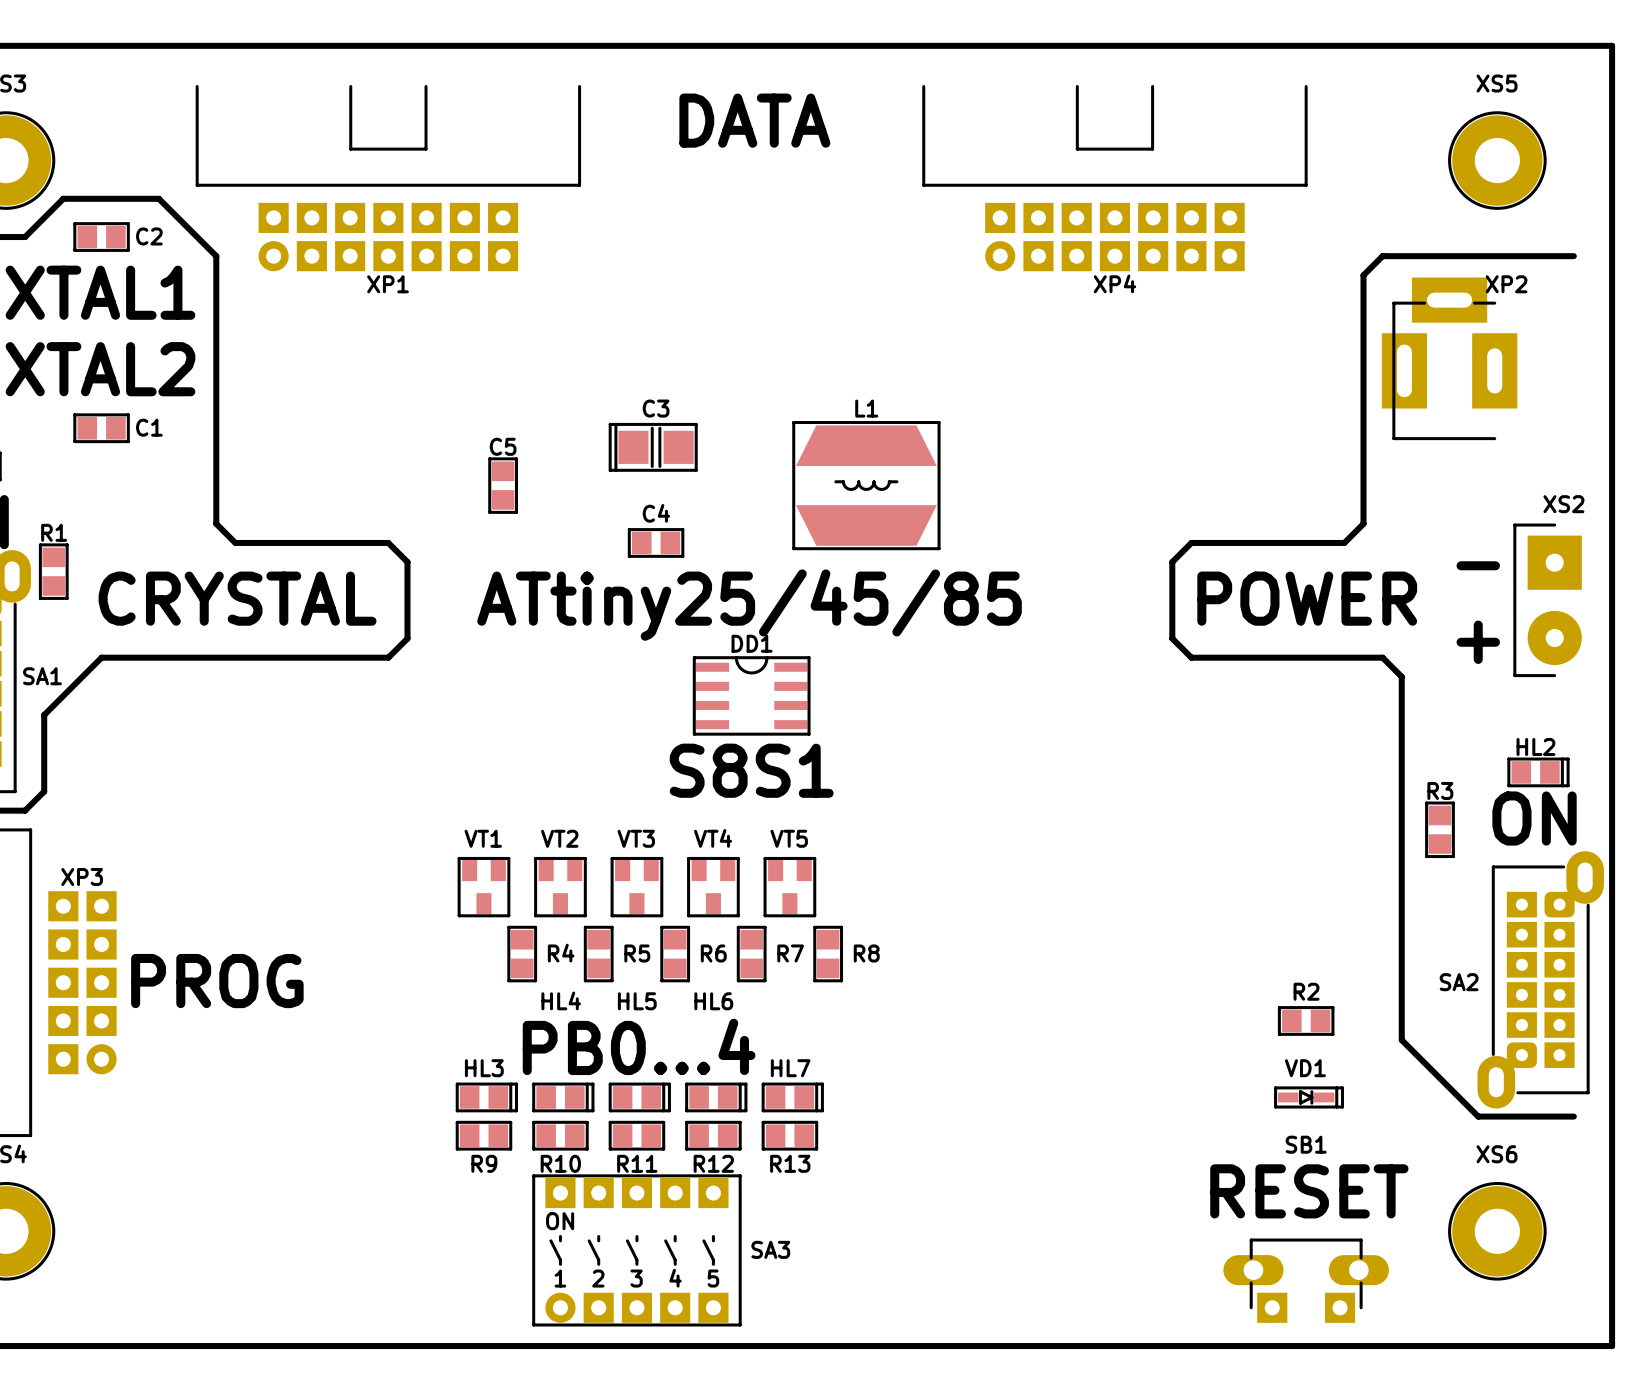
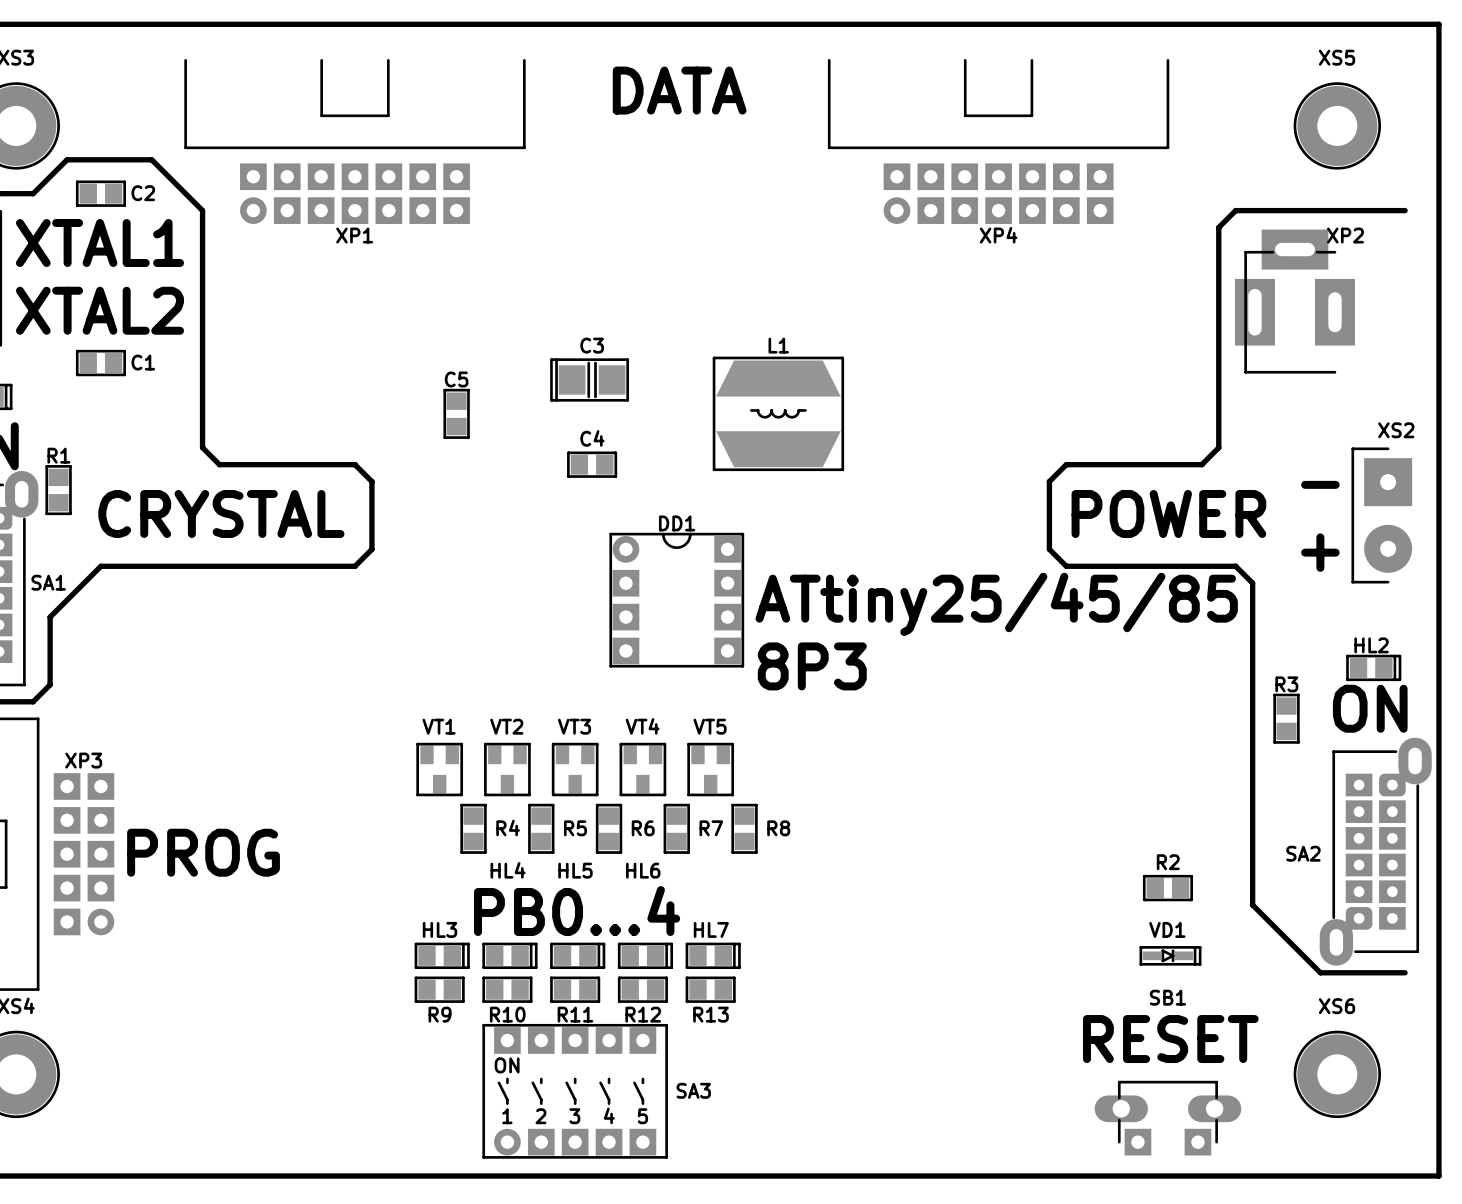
text position: ATtiny25/45/85 (749, 605) -> ATtiny25/45/85 (996, 604)
DD1 name position: DD1 (752, 643) -> DD1 (677, 523)
DD1 footprint: [692, 656, 811, 736] -> [609, 532, 745, 668]
text: S8S1 (751, 770) -> none
text: none -> 8P3 (812, 666)

